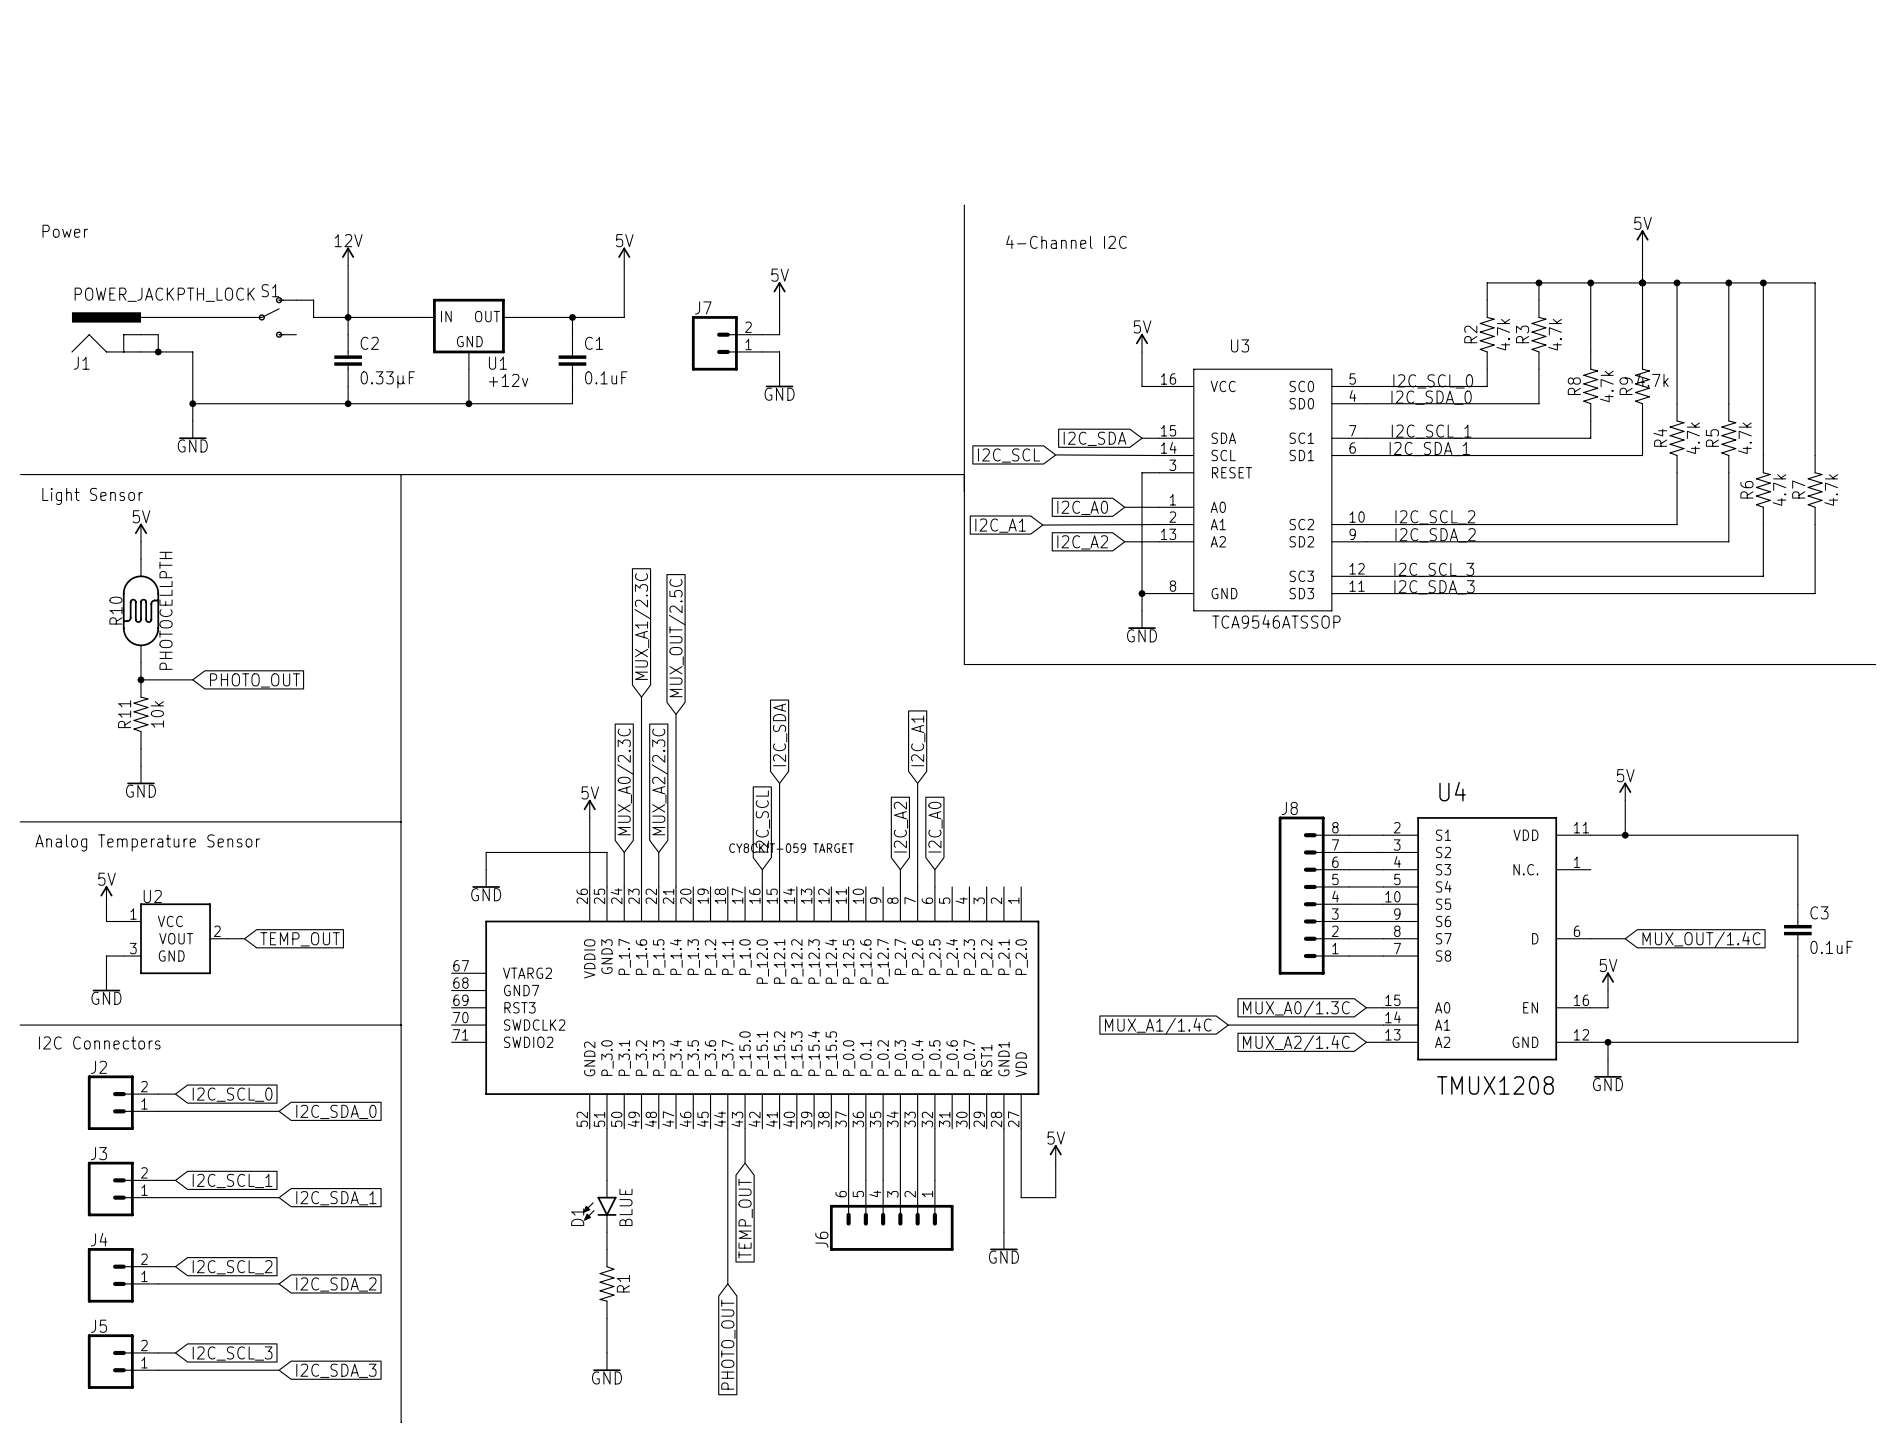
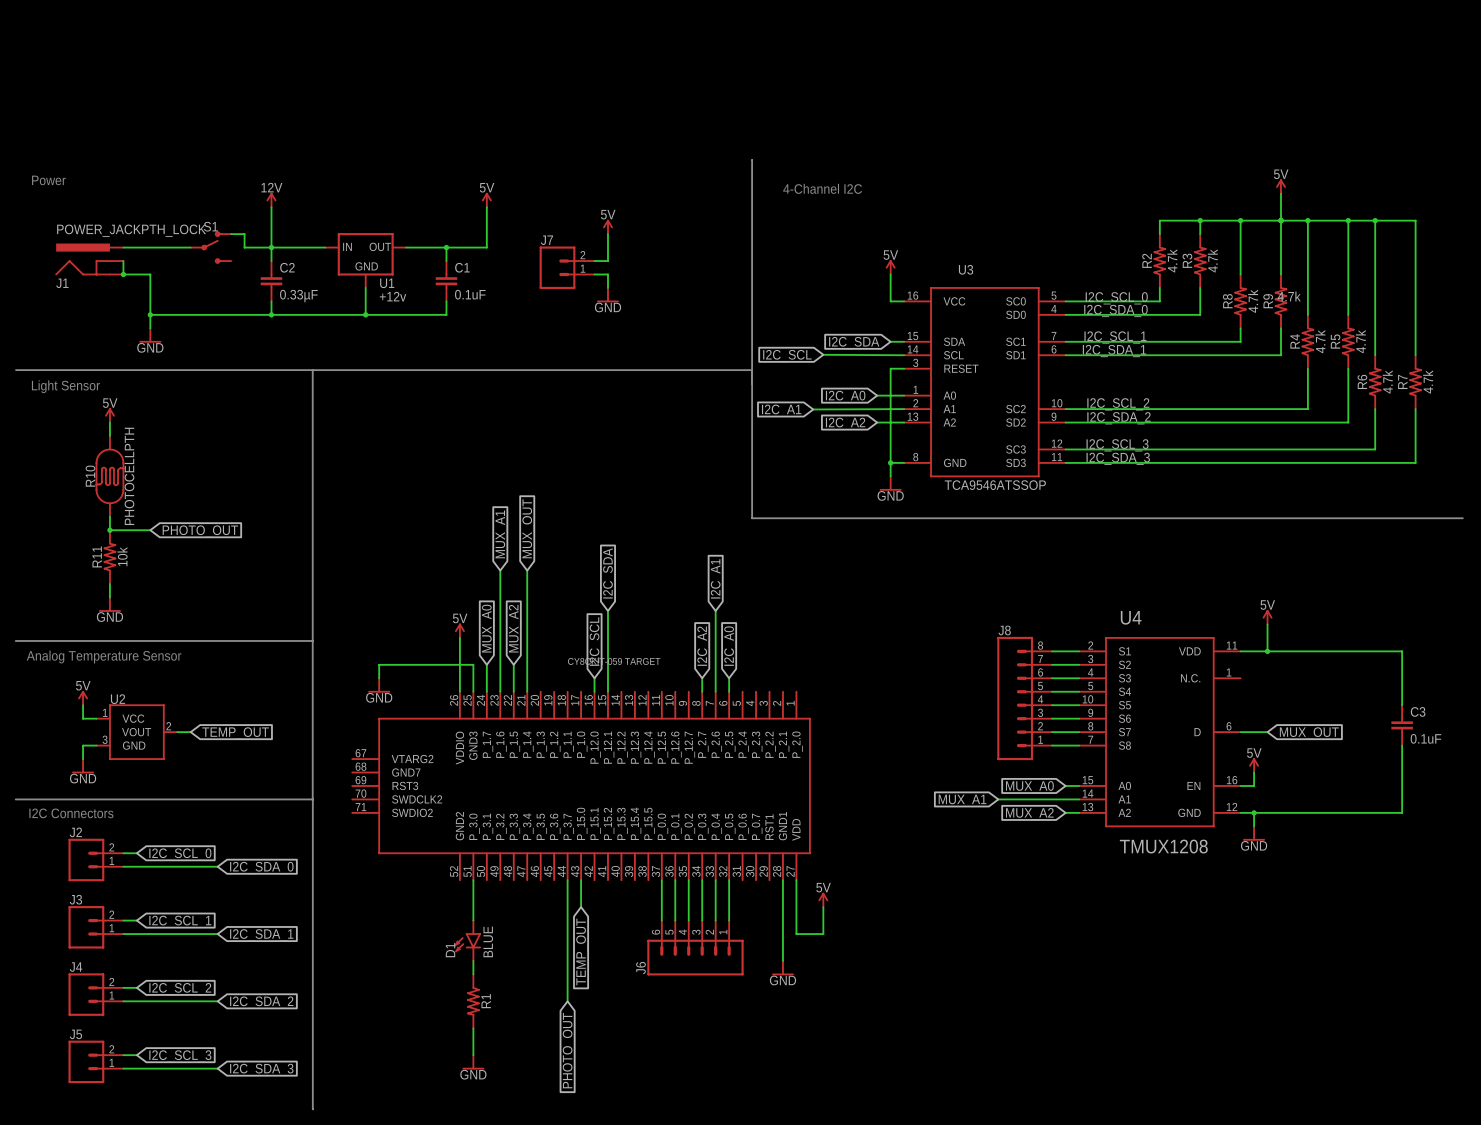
global label: MUX_A1/2.3C (642, 626) -> MUX_A1 (501, 534)
global label: MUX_OUT/2.5C (677, 638) -> MUX_OUT (528, 528)
wire: (641, 697) (641, 731) -> none
wire: (676, 714) (676, 731) -> none
global label: MUX_A0/2.3C (625, 781) -> MUX_A0 (488, 628)
global label: MUX_A2/2.3C (659, 781) -> MUX_A2 (515, 628)
global label: MUX_OUT/1.4C (1701, 939) -> MUX_OUT (1309, 733)
global label: MUX_A0/1.3C (1296, 1008) -> MUX_A0 (1029, 787)
wire: (1228, 1025) (1280, 1025) -> none
global label: MUX_A1/1.4C (1158, 1026) -> MUX_A1 (962, 800)
global label: MUX_A2/1.4C (1296, 1043) -> MUX_A2 (1029, 814)

